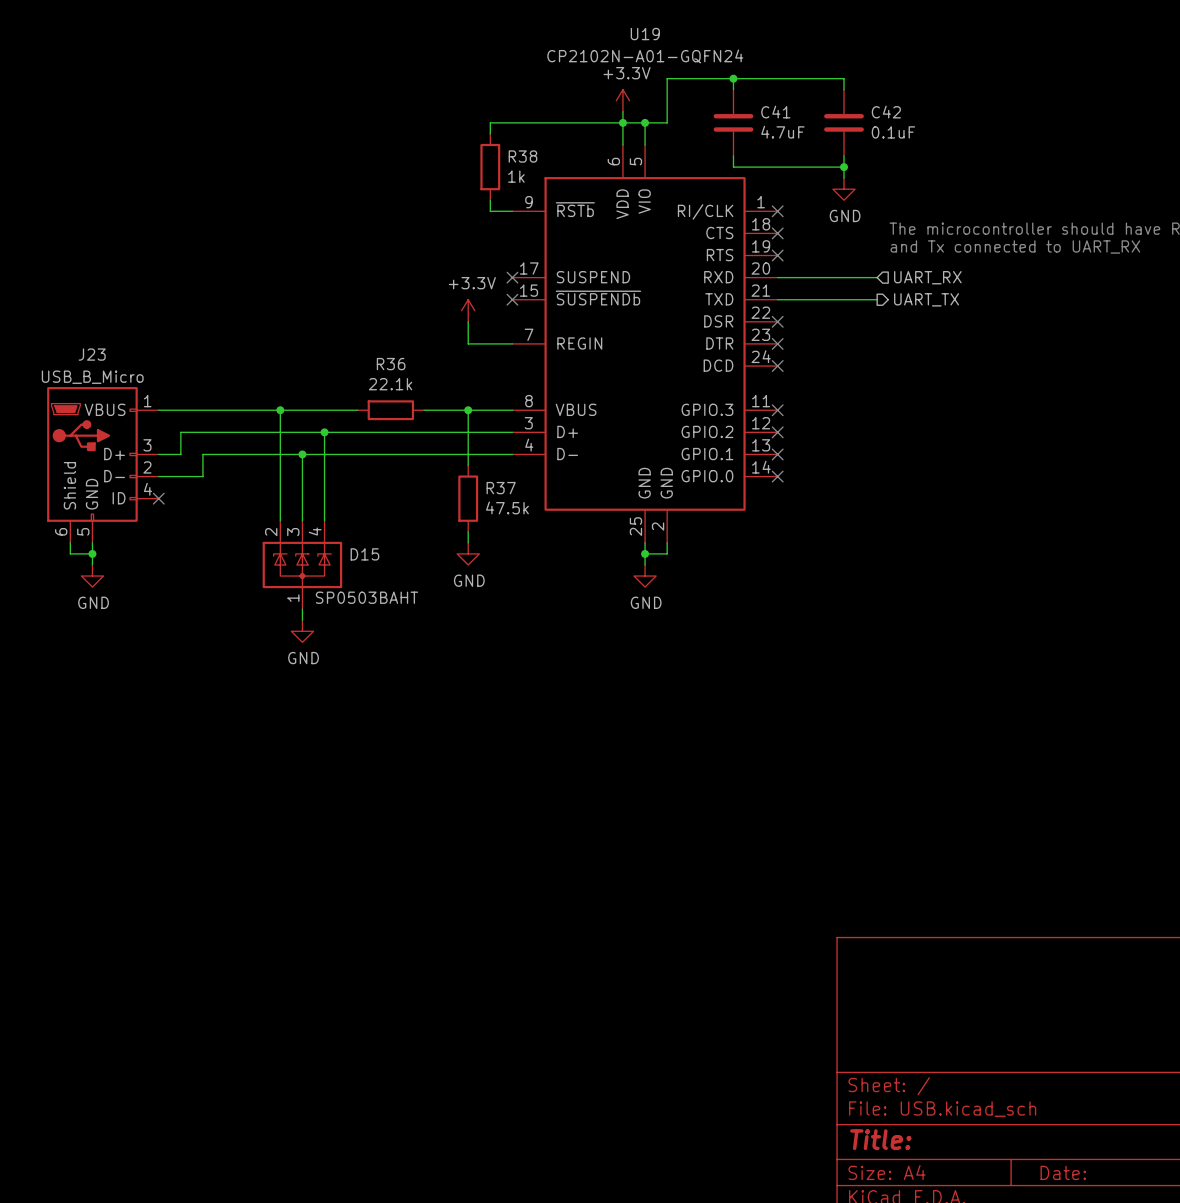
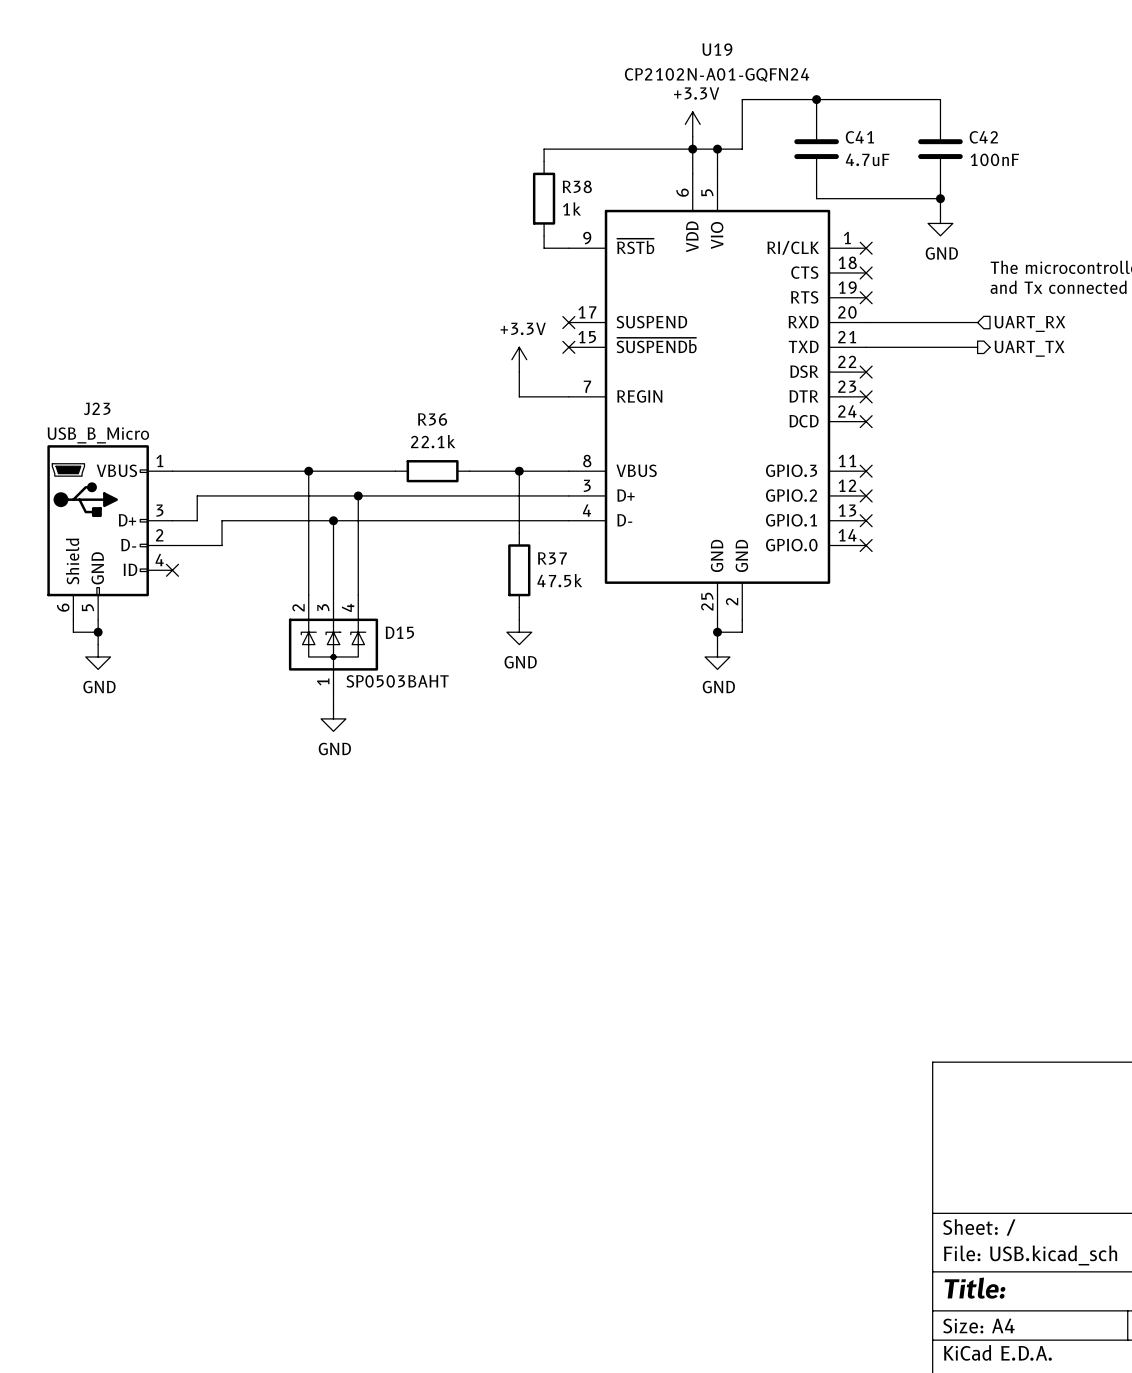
C42 value: 0.1uF (893, 132) -> 100nF (994, 159)

